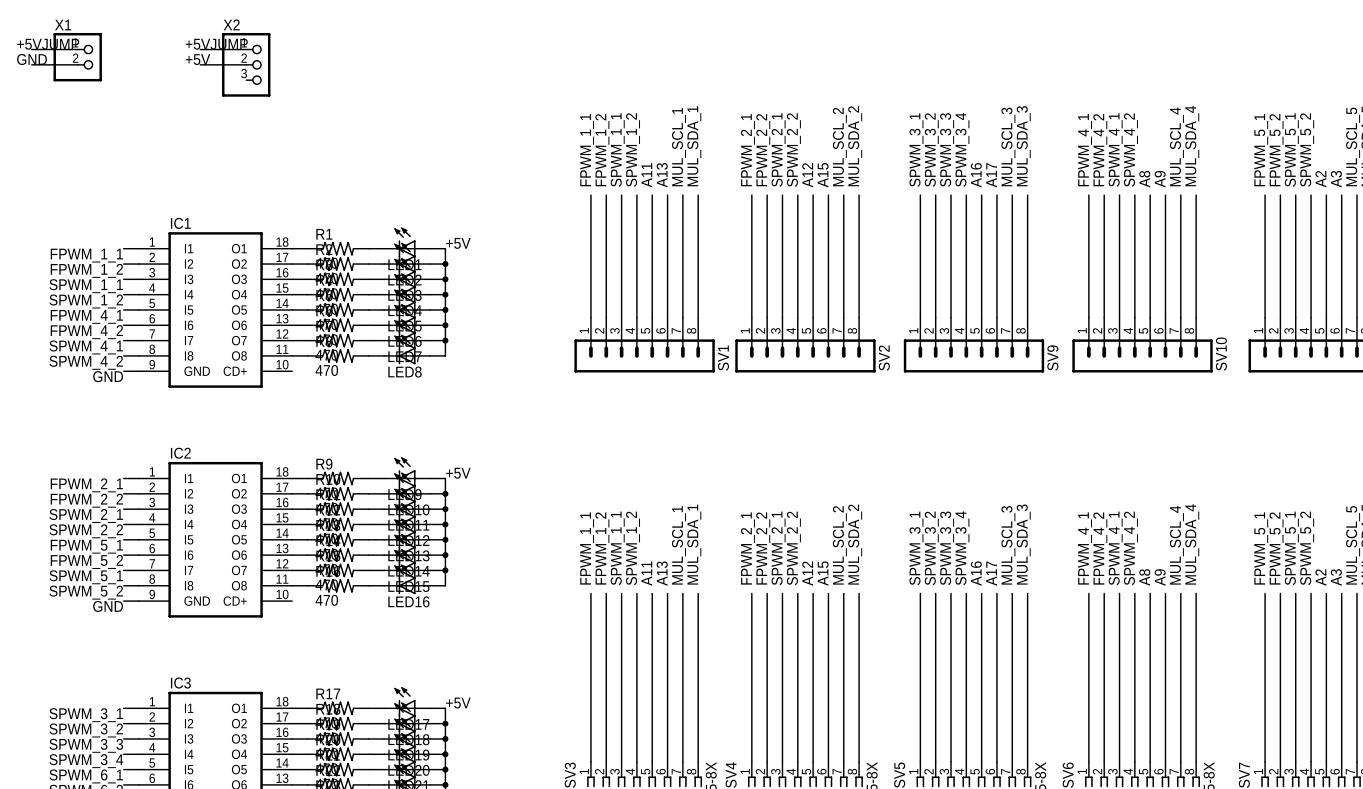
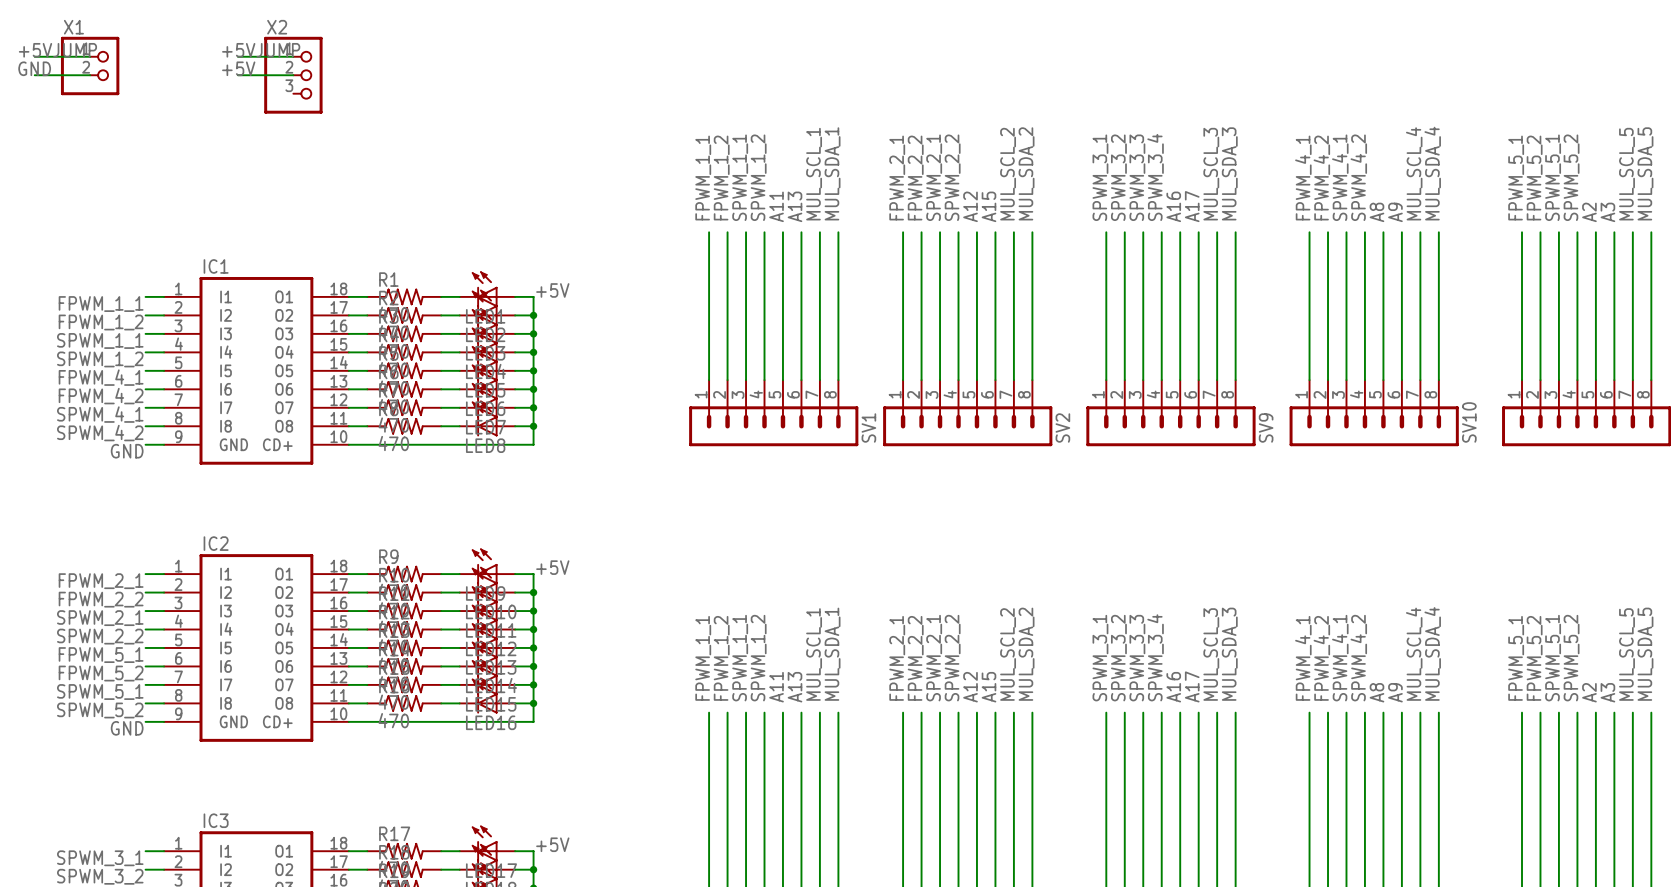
wire: none -> (533, 426) (533, 444) (348, 444)
junction: none -> (533, 426)
wire: none -> (533, 703) (533, 721) (348, 721)
junction: none -> (533, 703)

